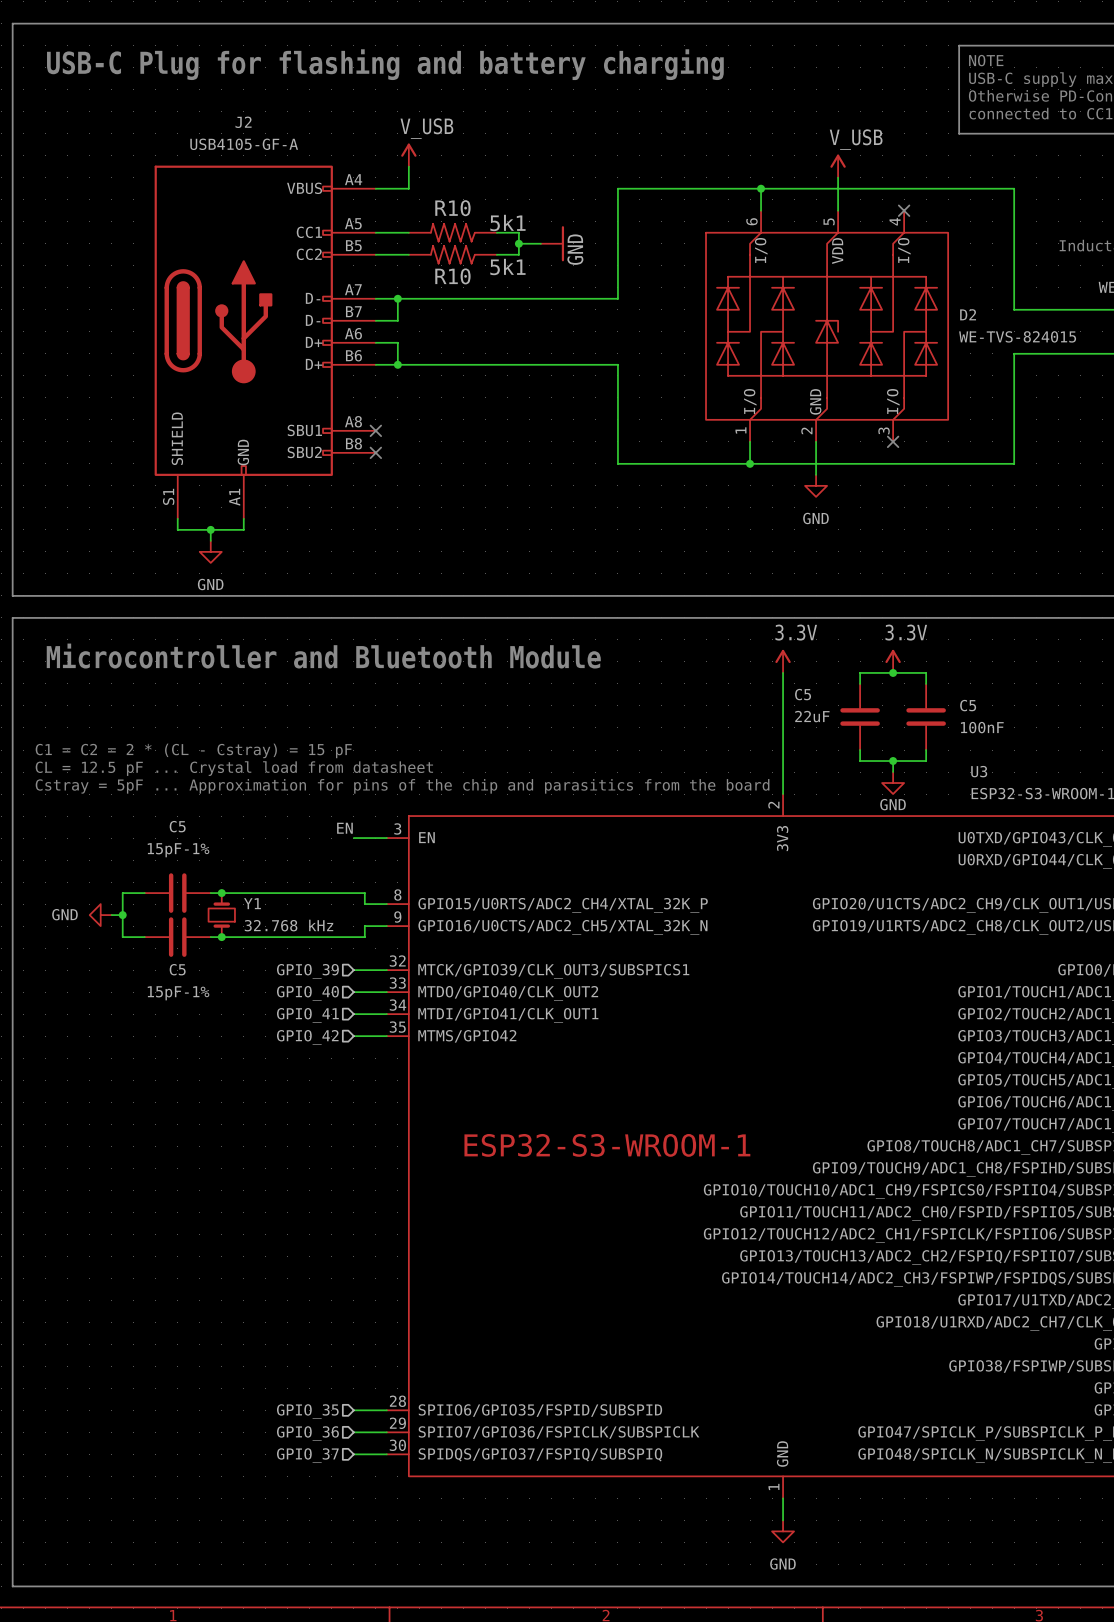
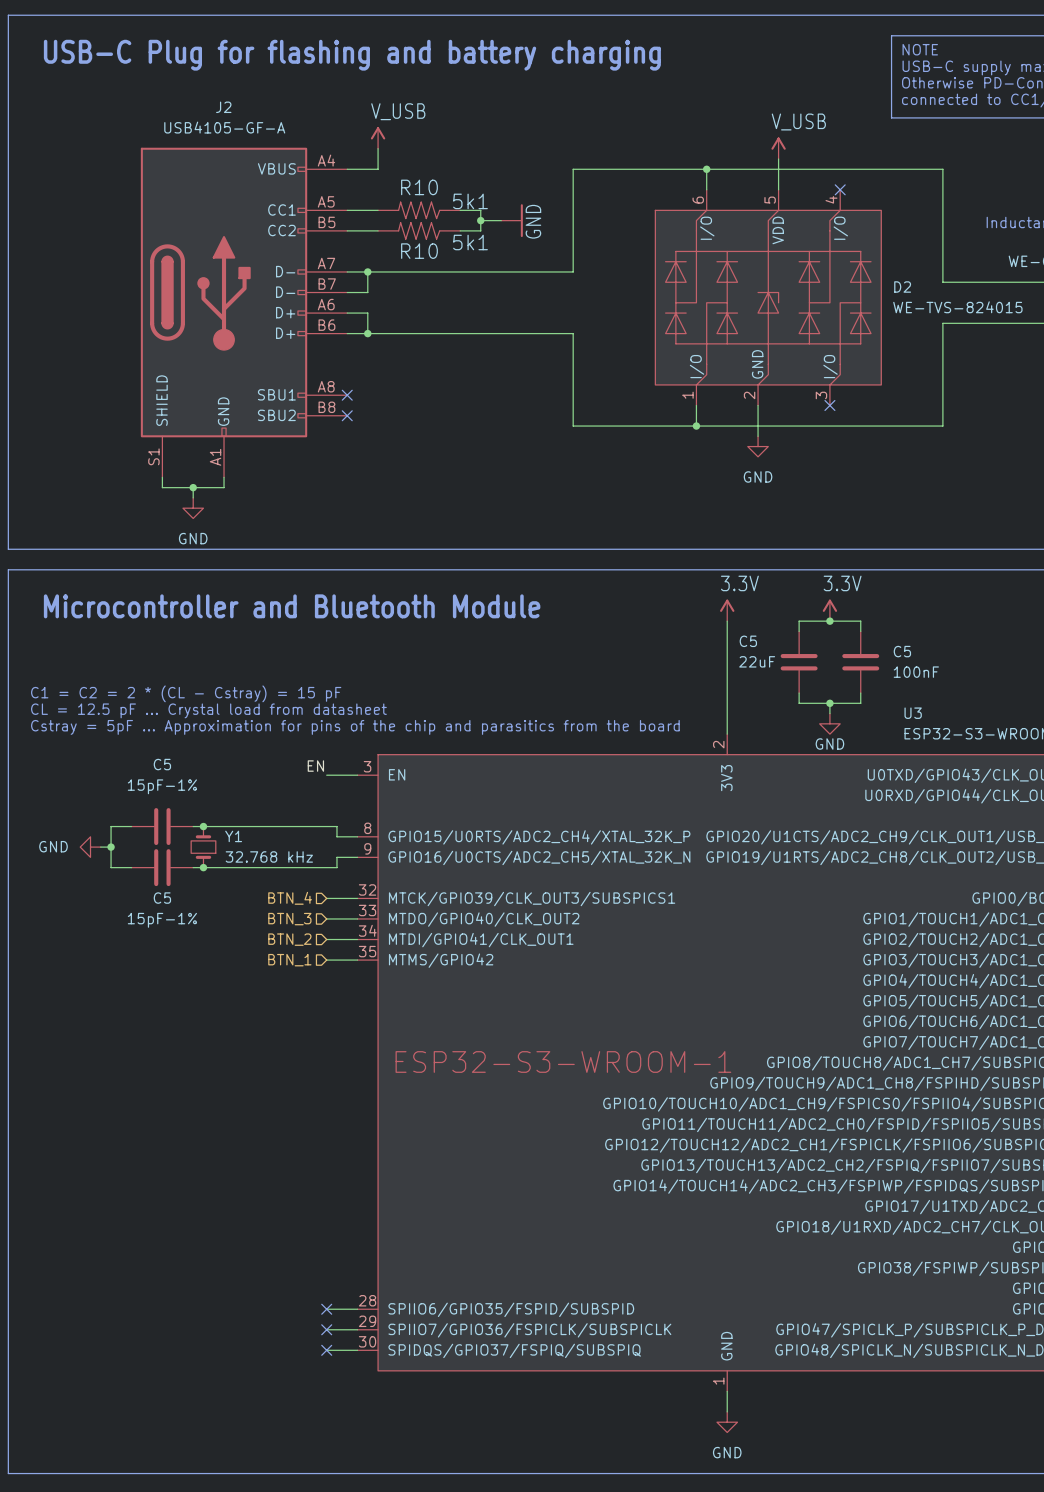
hierarchical label: GPIO_39 (307, 971) -> BTN_4 (290, 898)
hierarchical label: GPIO_40 (307, 993) -> BTN_3 (289, 919)
hierarchical label: GPIO_41 (307, 1015) -> BTN_2 (289, 939)
hierarchical label: GPIO_42 (307, 1037) -> BTN_1 (289, 960)
no-connect mark: none -> (326, 1309)
hierarchical label: GPIO_35 (307, 1411) -> none
no-connect mark: none -> (326, 1329)
hierarchical label: GPIO_36 (307, 1433) -> none
no-connect mark: none -> (326, 1350)
hierarchical label: GPIO_37 (307, 1455) -> none

